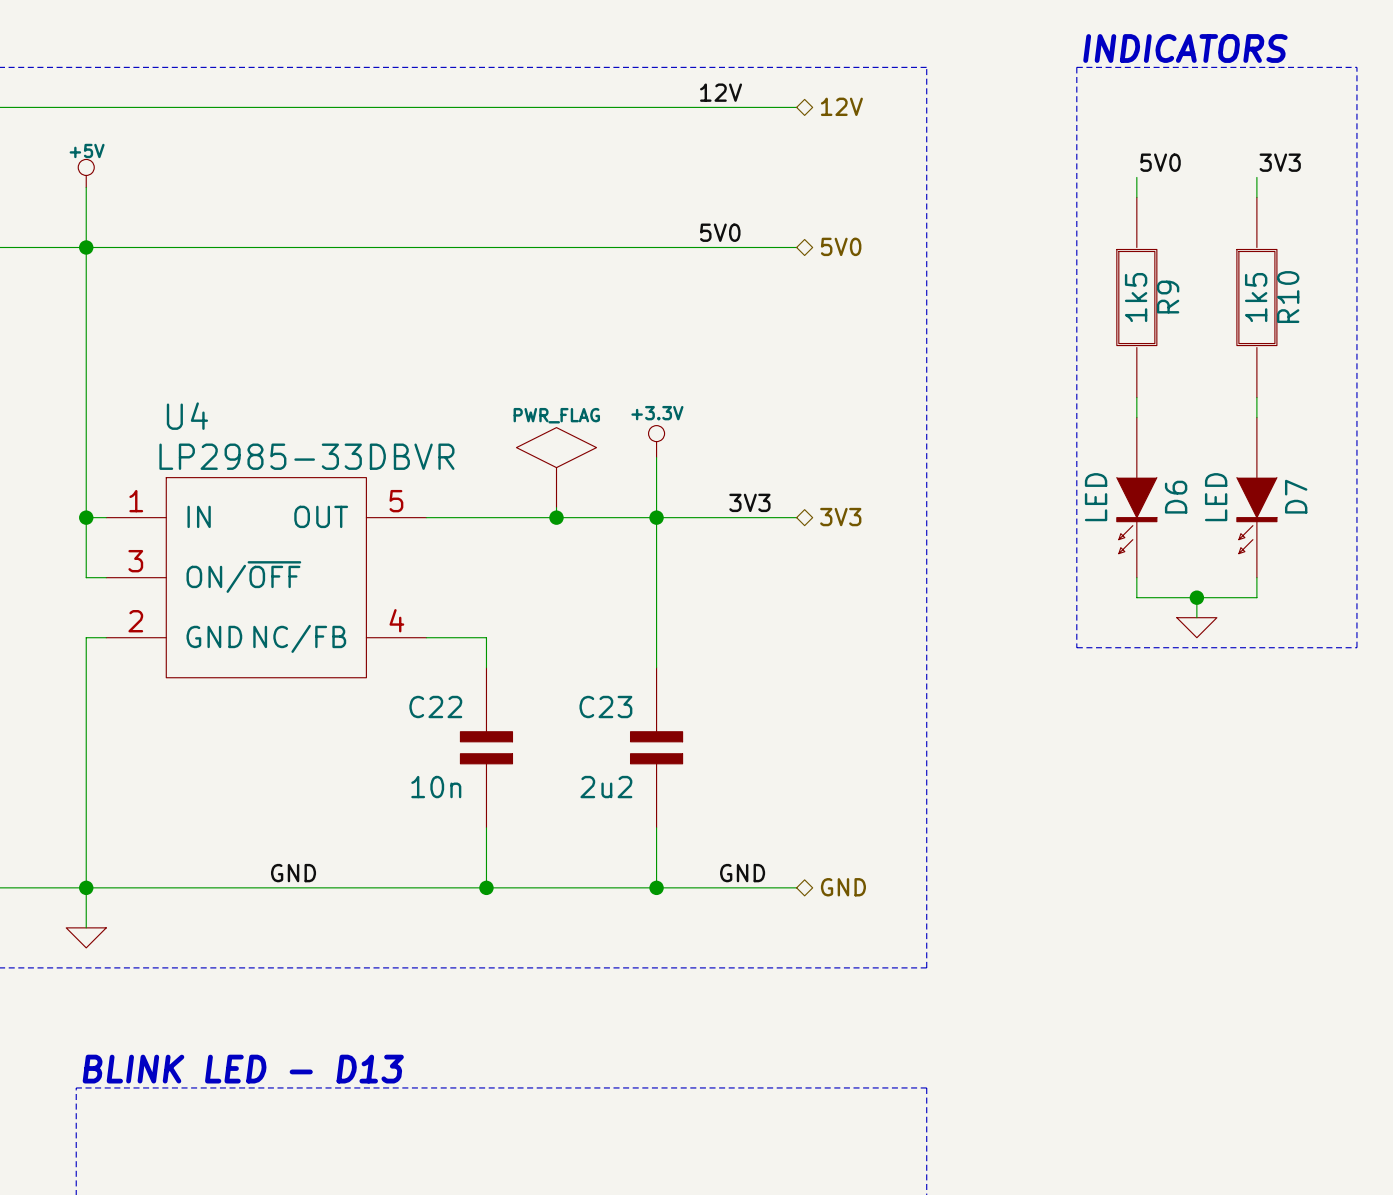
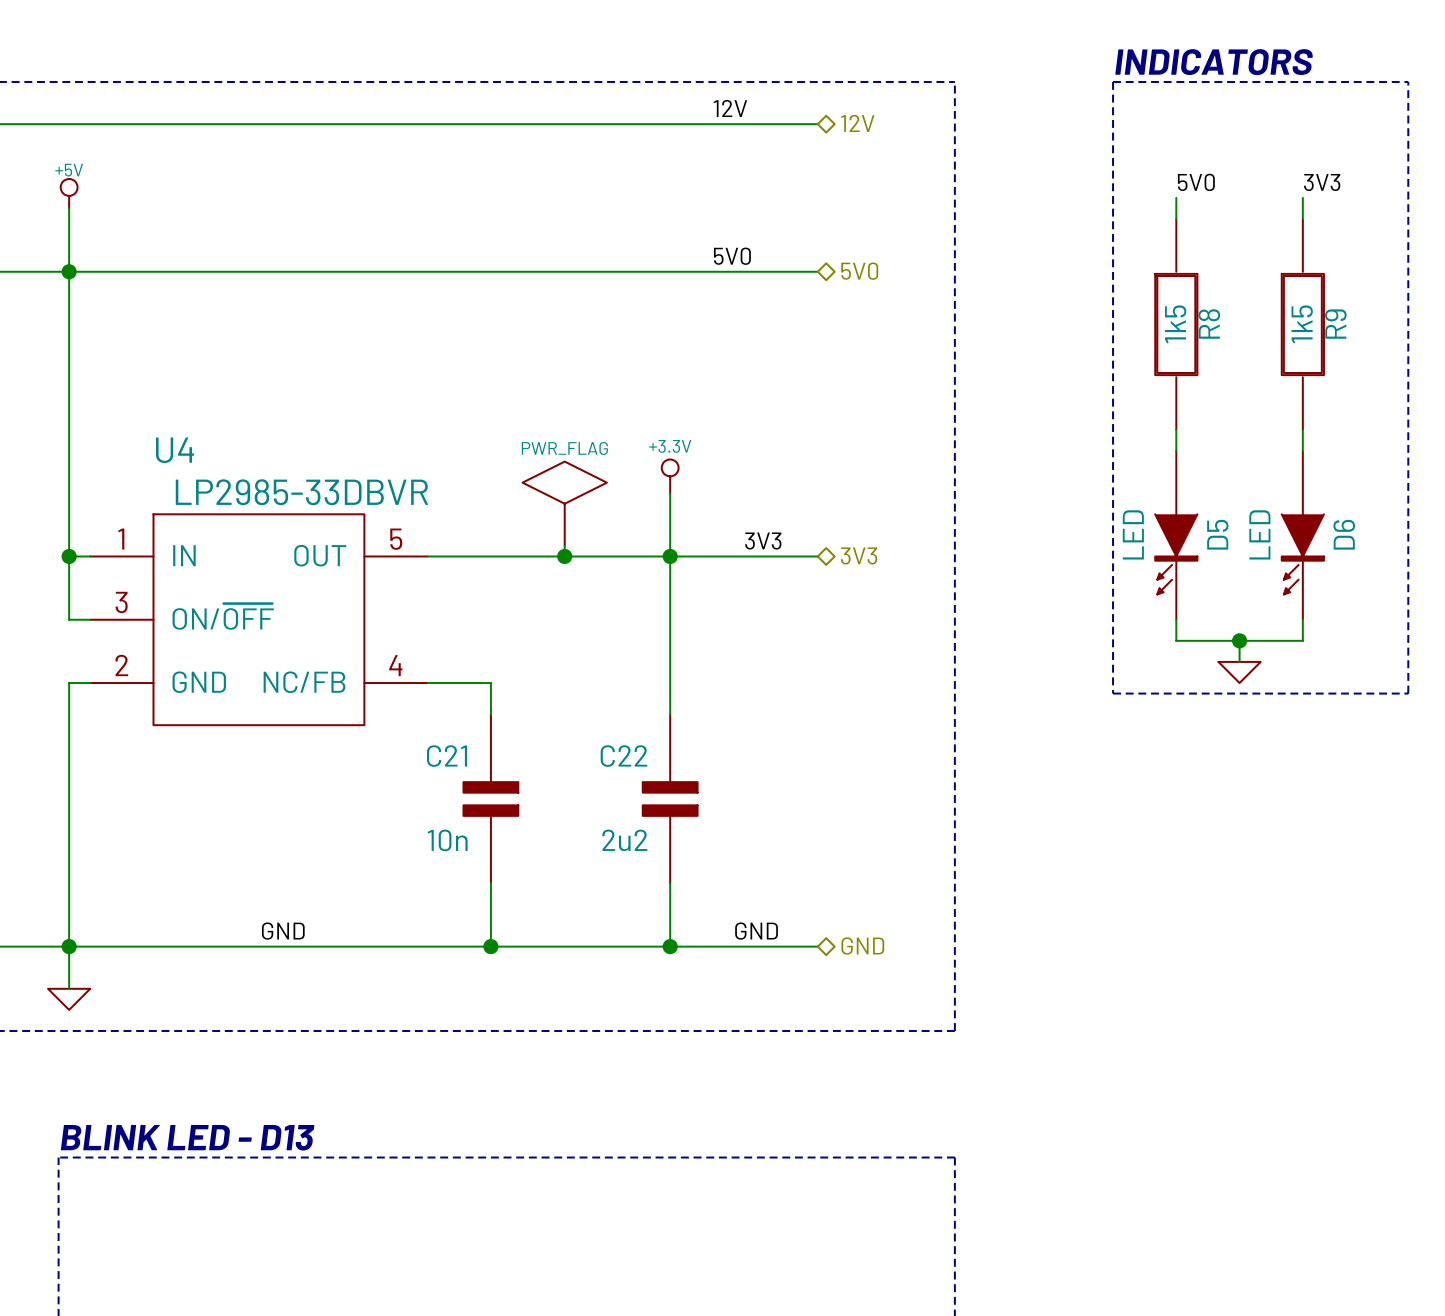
R9 name: R9 (1168, 297) -> R8 (1209, 324)
R10 name: R10 (1288, 297) -> R9 (1335, 324)
D7 name: D7 (1296, 496) -> D6 (1344, 534)
D6 name: D6 (1176, 497) -> D5 (1217, 534)
C22 name: C22 (435, 707) -> C21 (447, 756)
C23 name: C23 (605, 707) -> C22 (624, 756)

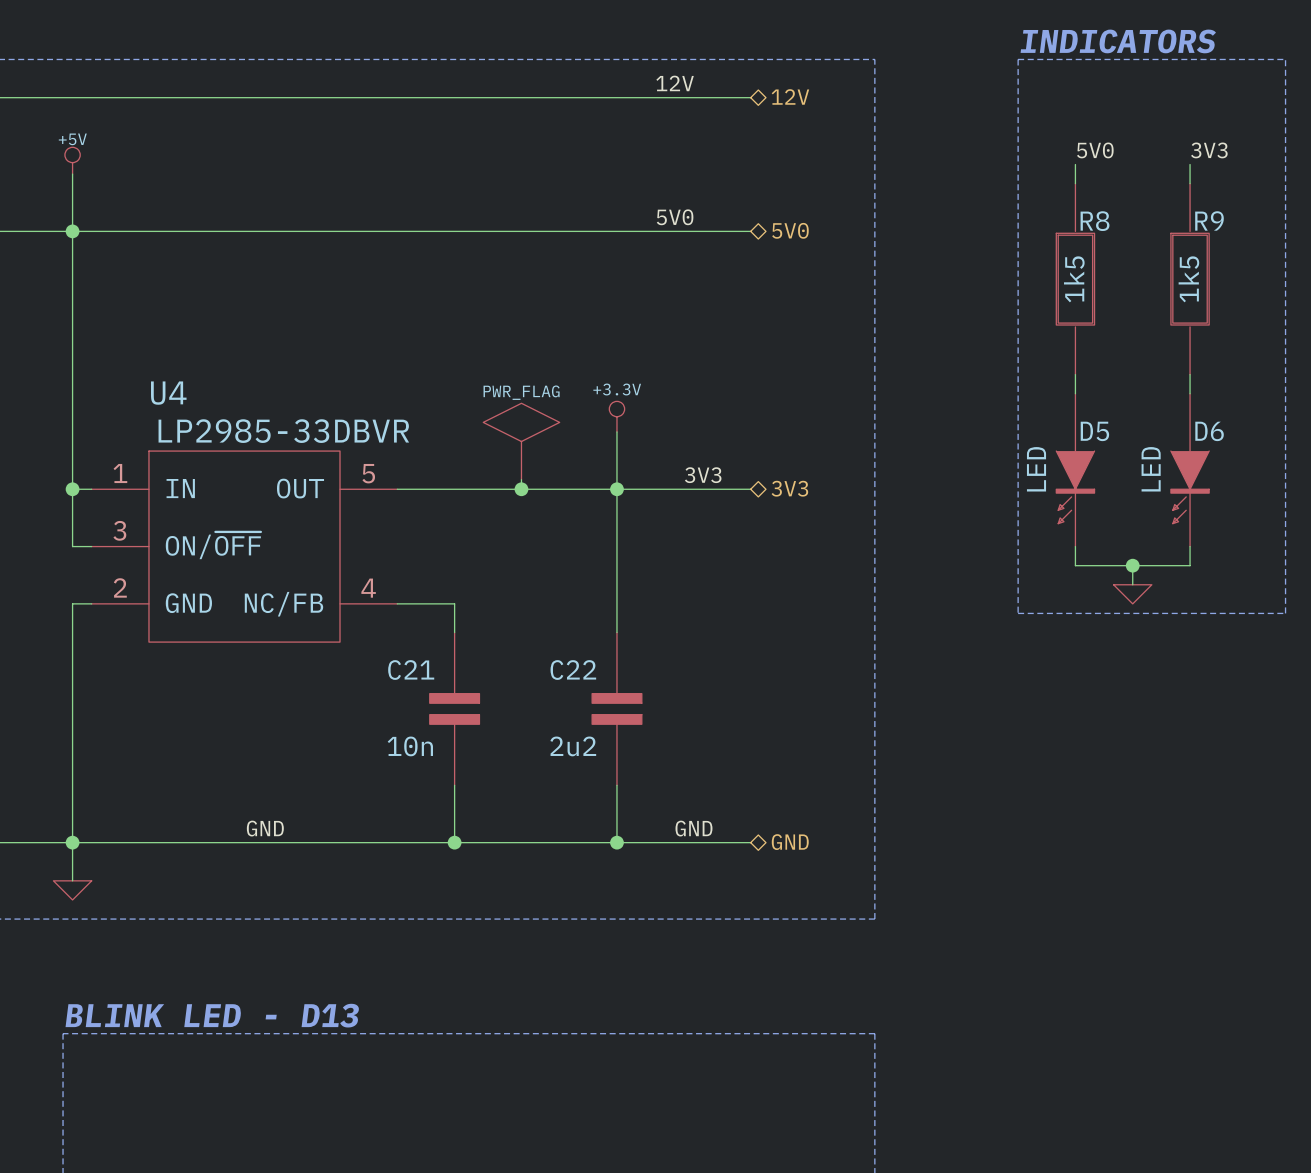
R8 name rotation: 0° (1209, 324) -> 90° clockwise (1095, 221)
R8 name position: R8 (1209, 324) -> R8 (1095, 221)
R9 name rotation: 0° (1335, 324) -> 90° clockwise (1209, 220)
R9 name position: R9 (1335, 324) -> R9 (1209, 220)
D5 name rotation: 0° (1217, 534) -> 90° clockwise (1094, 431)
D6 name rotation: 0° (1344, 534) -> 90° clockwise (1209, 431)

